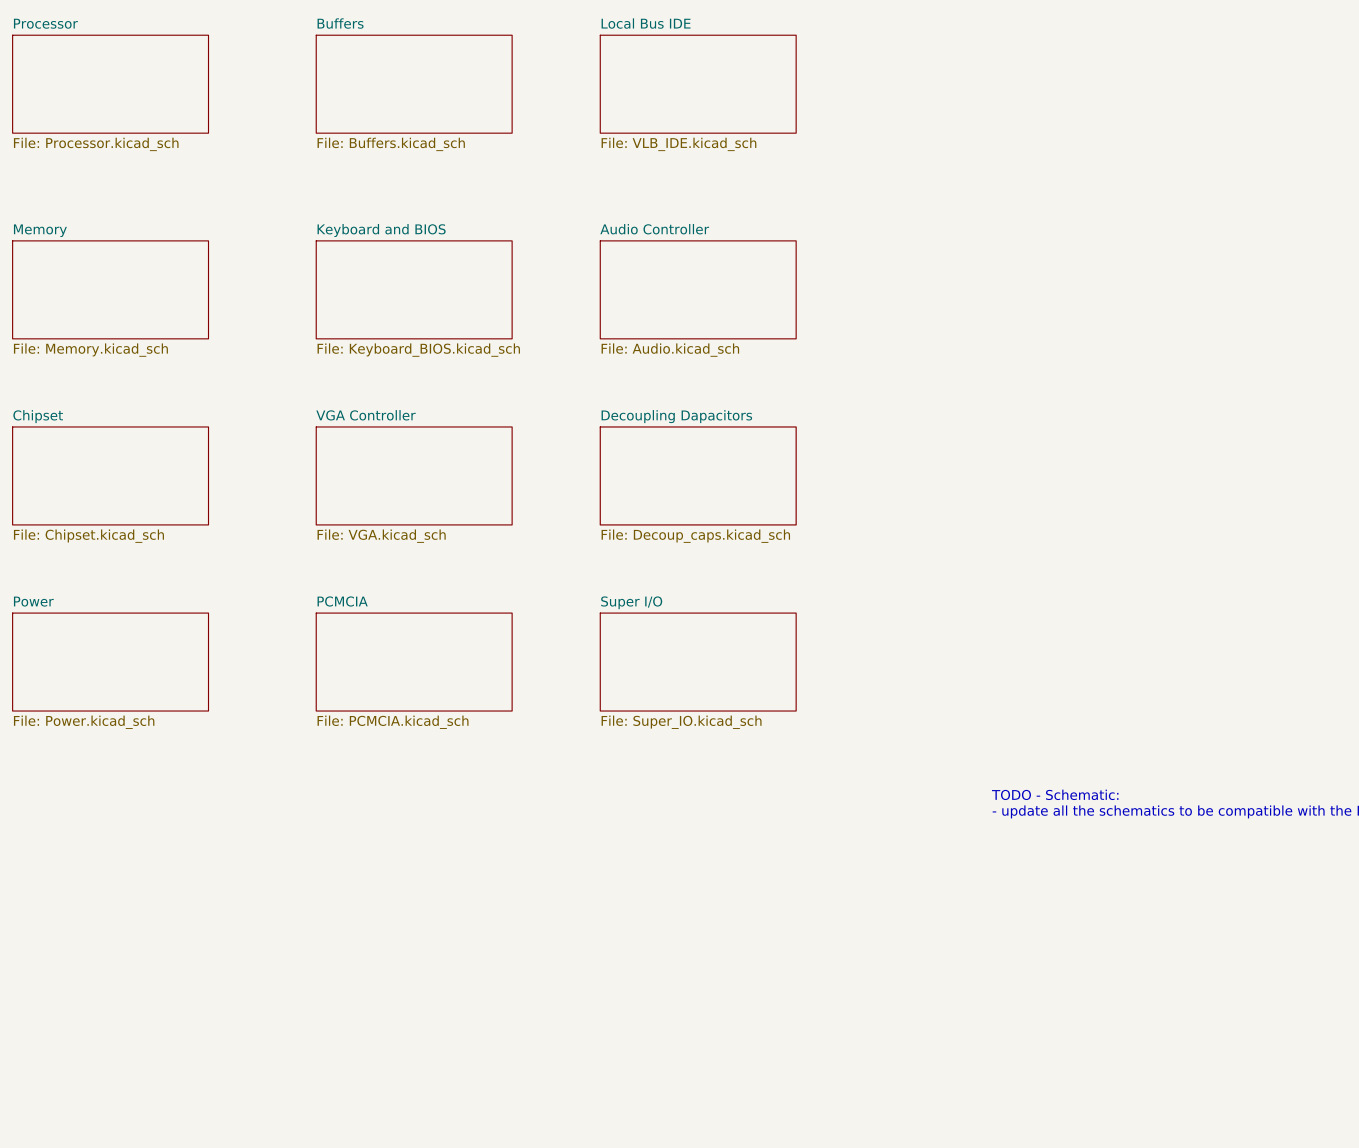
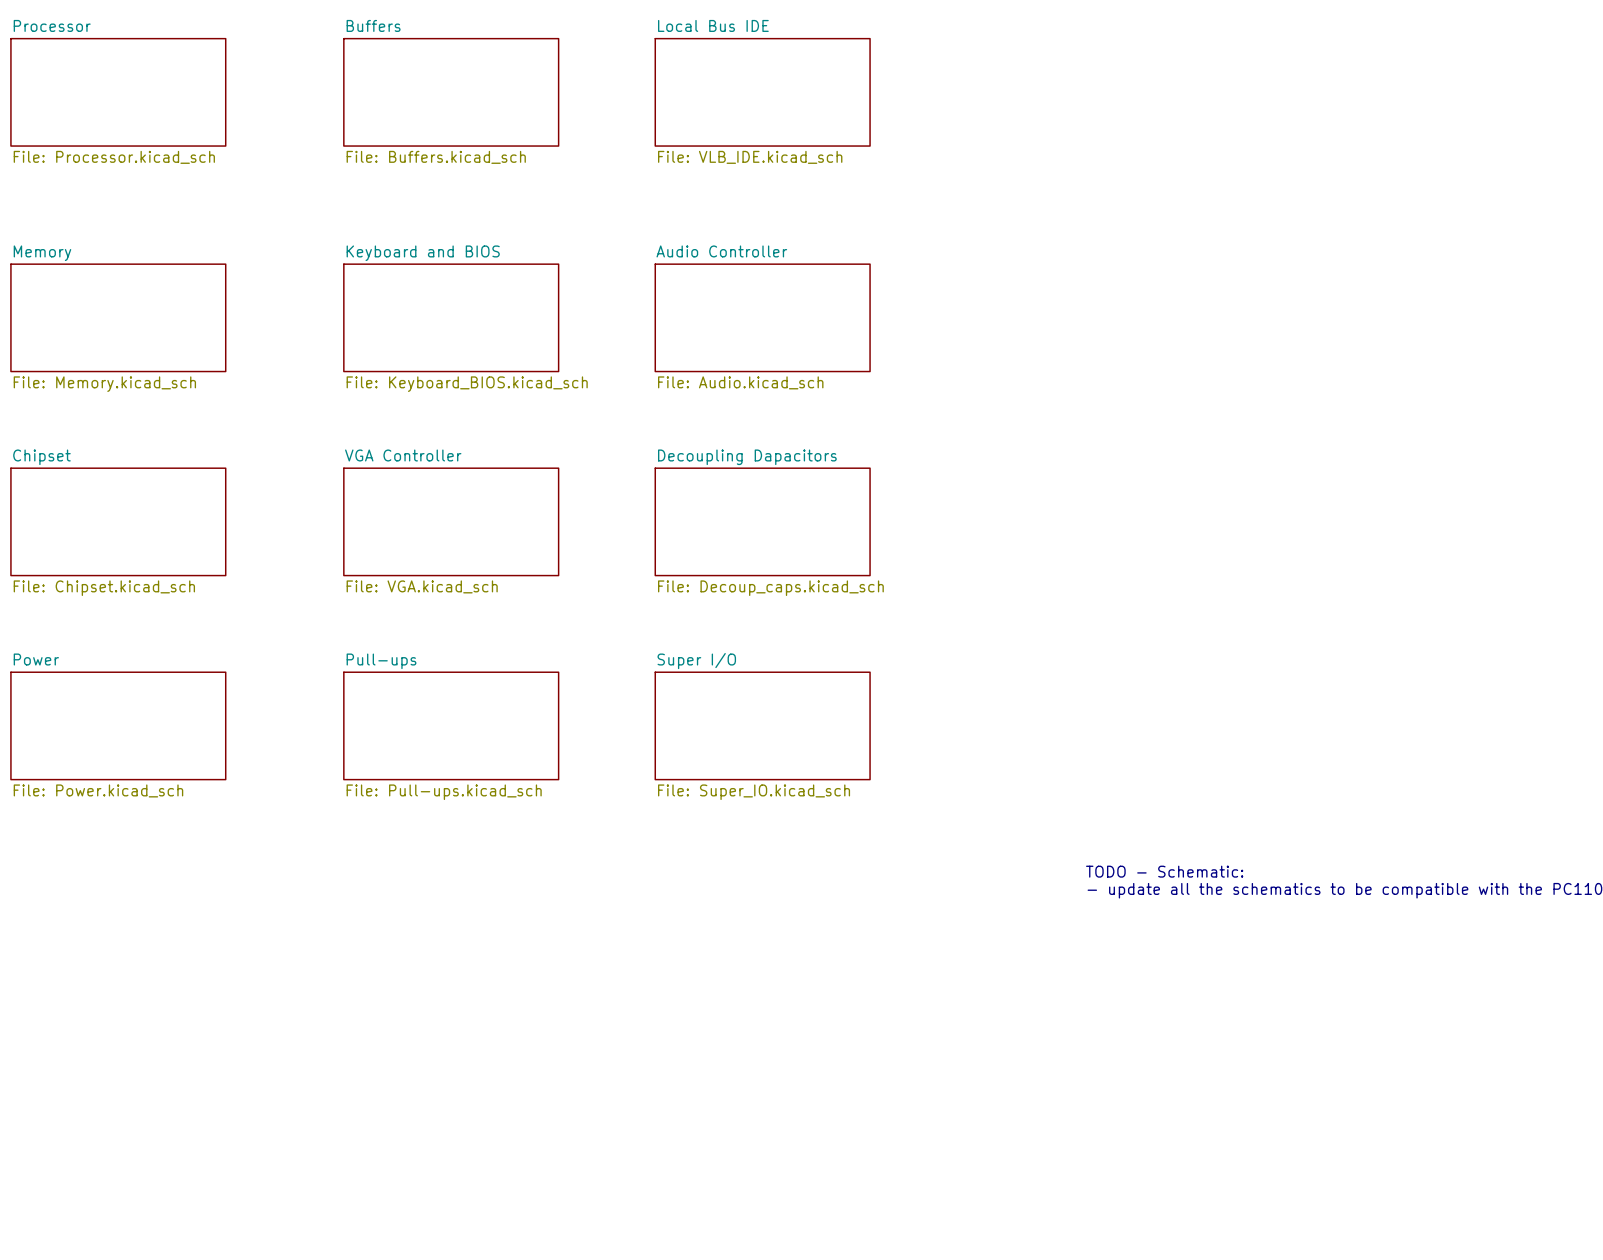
sheet PCMCIA name: PCMCIA (342, 601) -> Pull-ups (381, 661)
sheet PCMCIA value: File: PCMCIA.kicad_sch (393, 722) -> File: Pull-ups.kicad_sch (444, 792)

